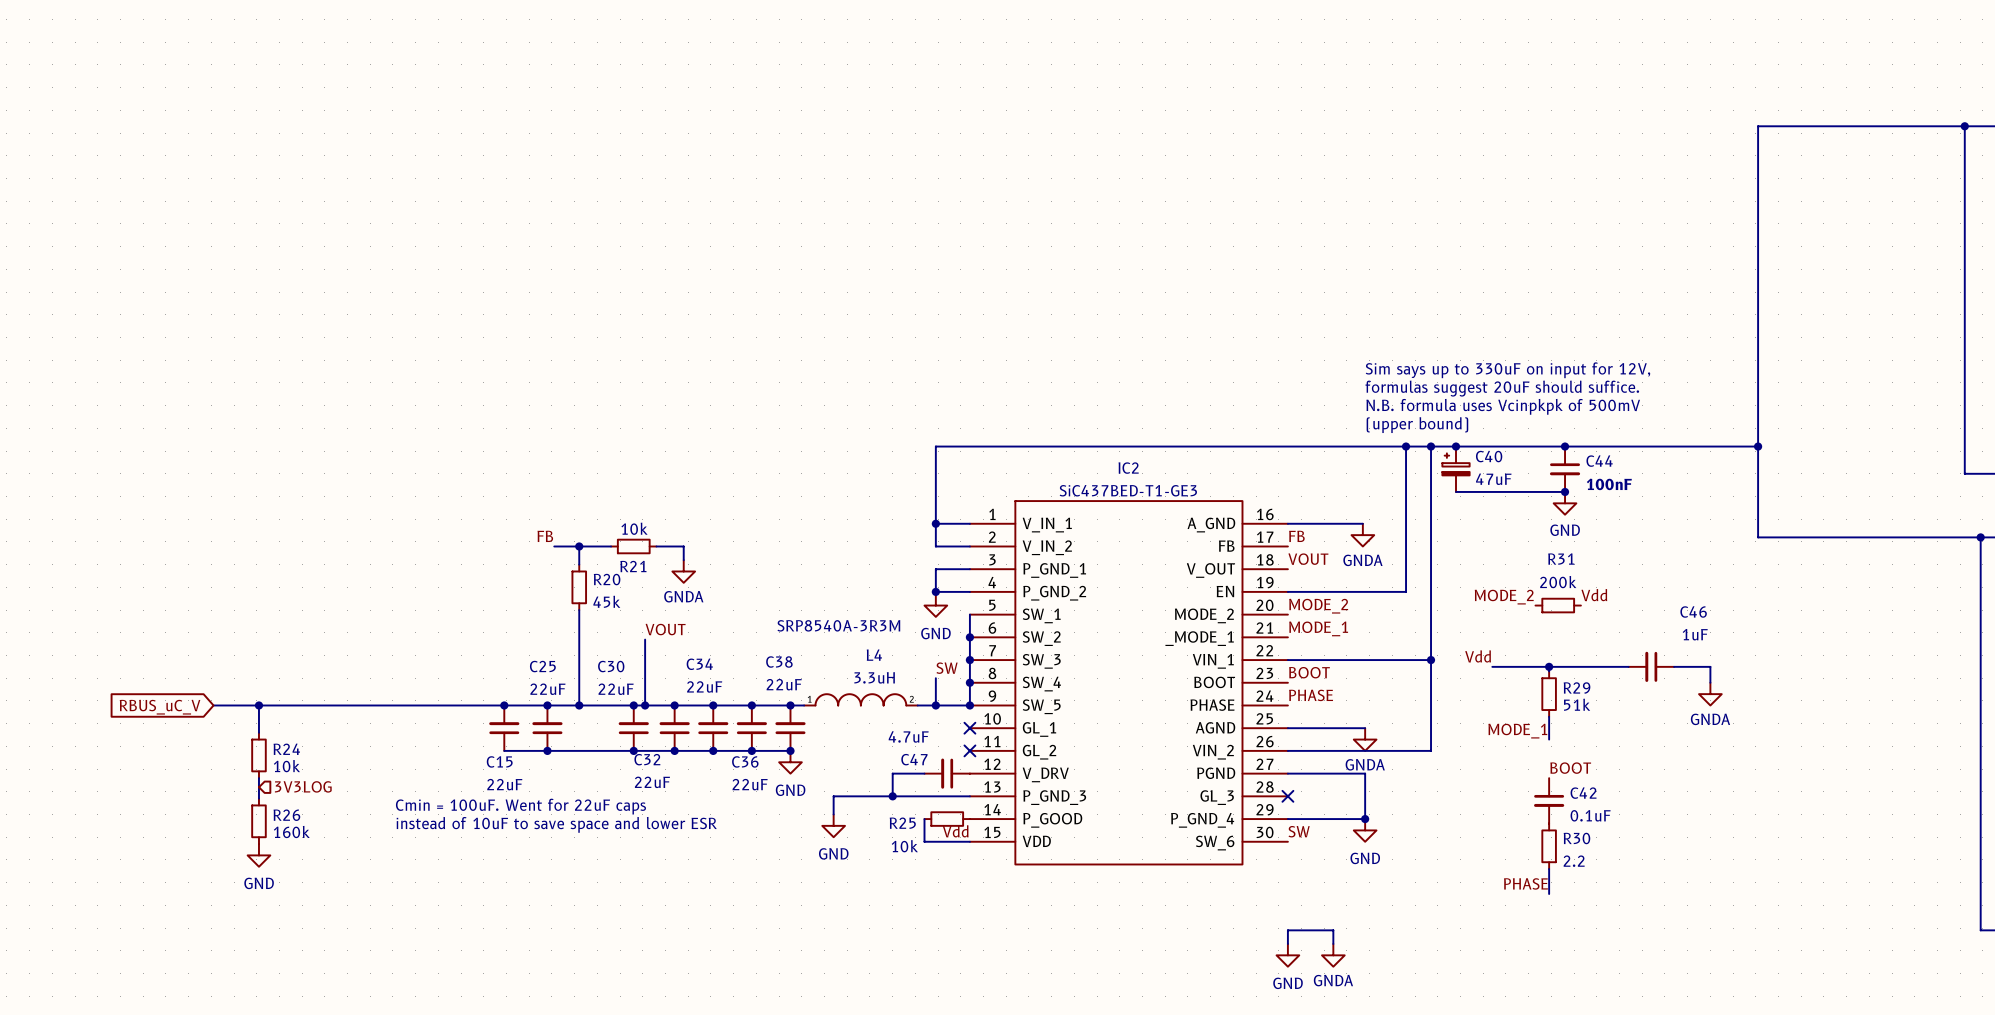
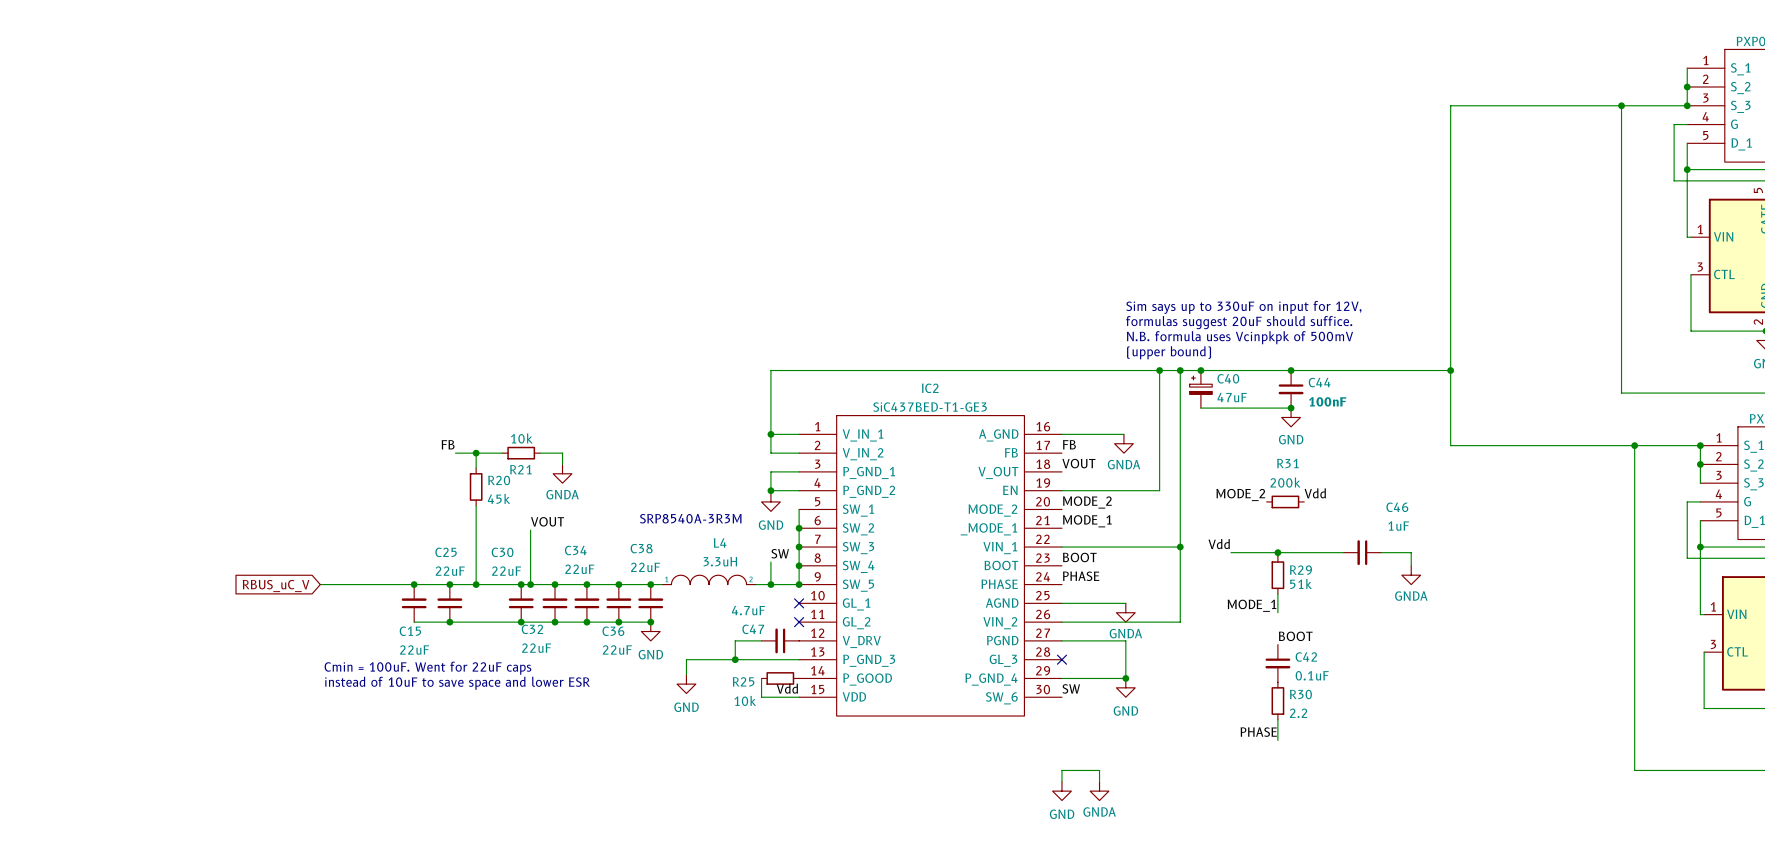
wire: (213, 705) (390, 705) -> none
wire: (258, 705) (258, 732) -> none
junction: (258, 705) -> none
global label position: RBUS_uC_V (160, 707) -> RBUS_uC_V (276, 585)
R24: 10k (258, 755) -> none
wire: (258, 778) (258, 798) -> none
hierarchical label: 3V3LOG (303, 786) -> none
R26: 160k (258, 821) -> none
power symbol: GND (258, 855) -> none

